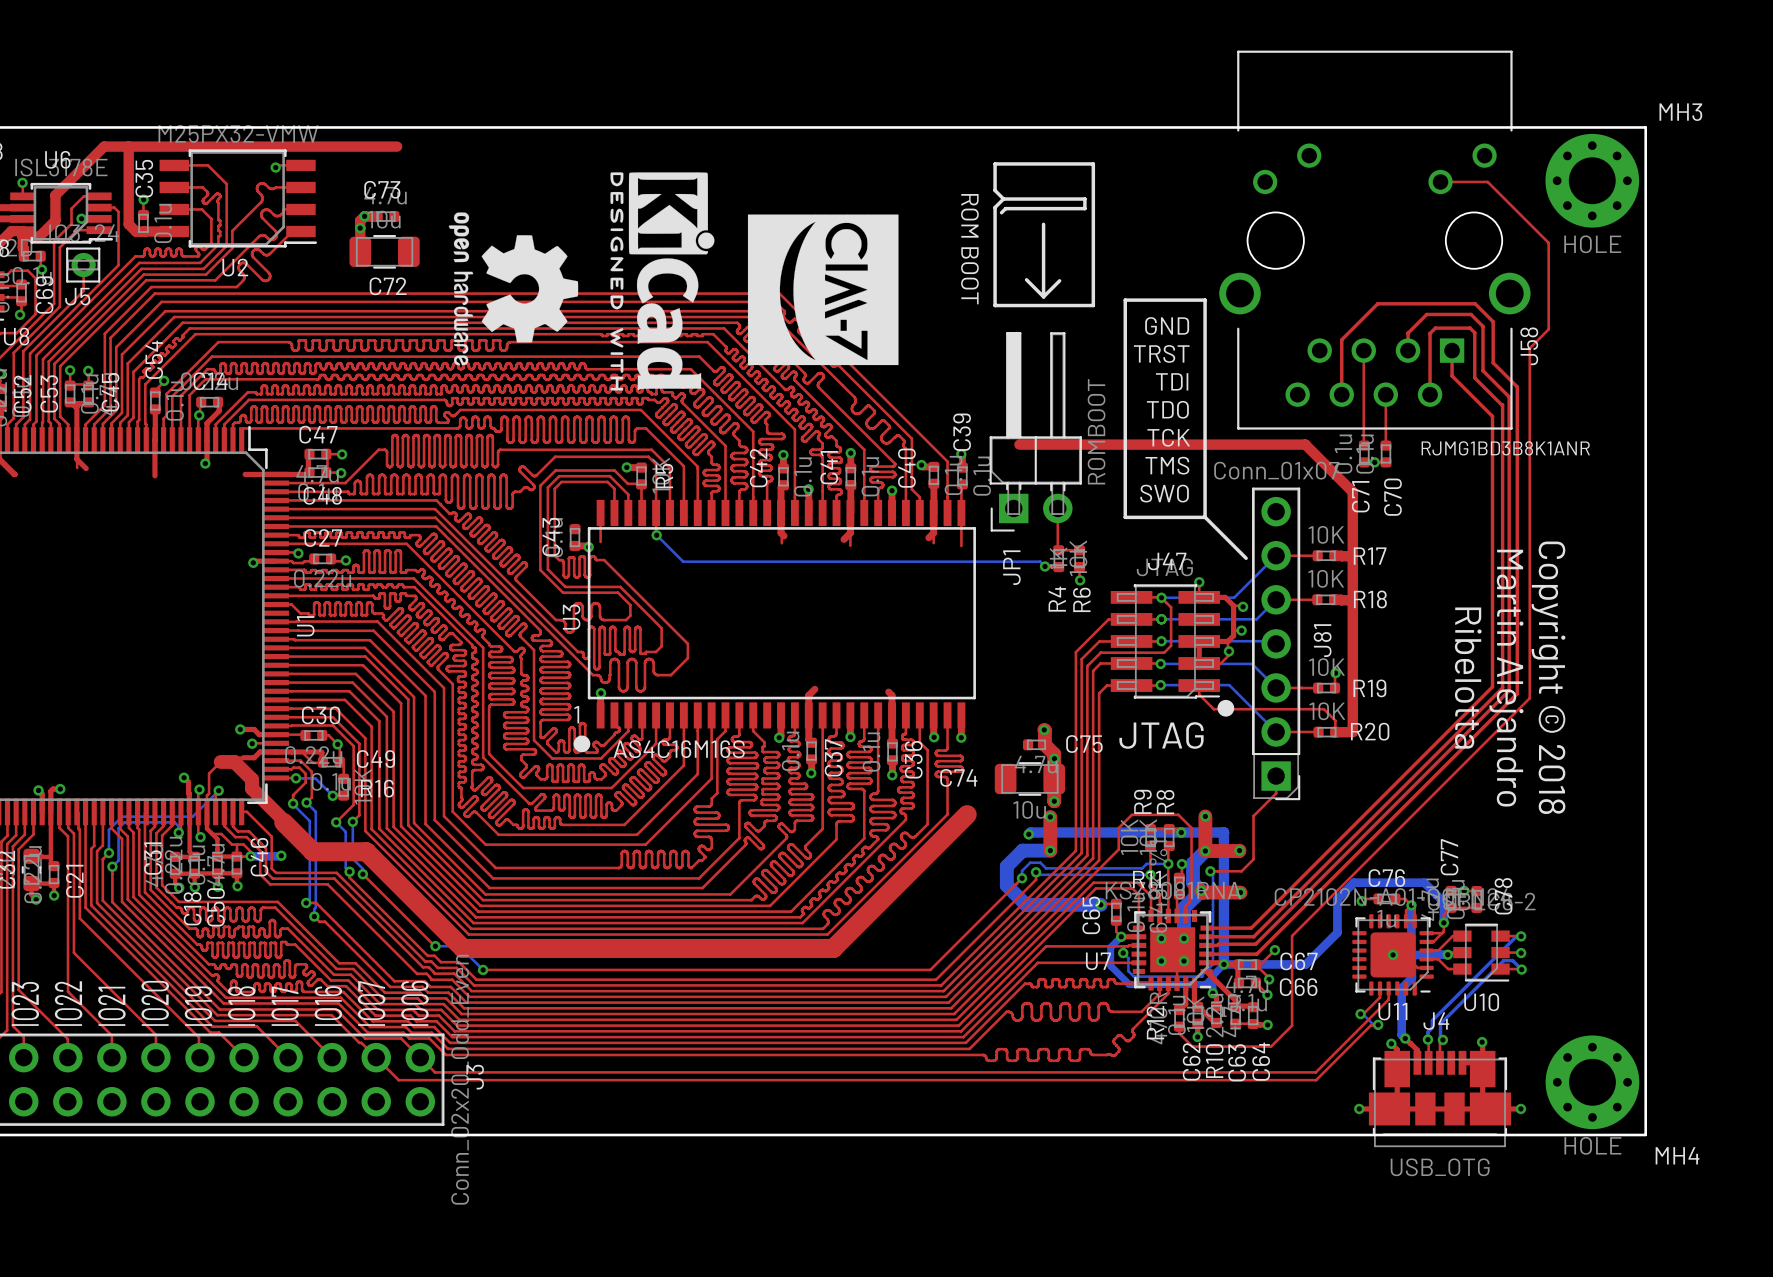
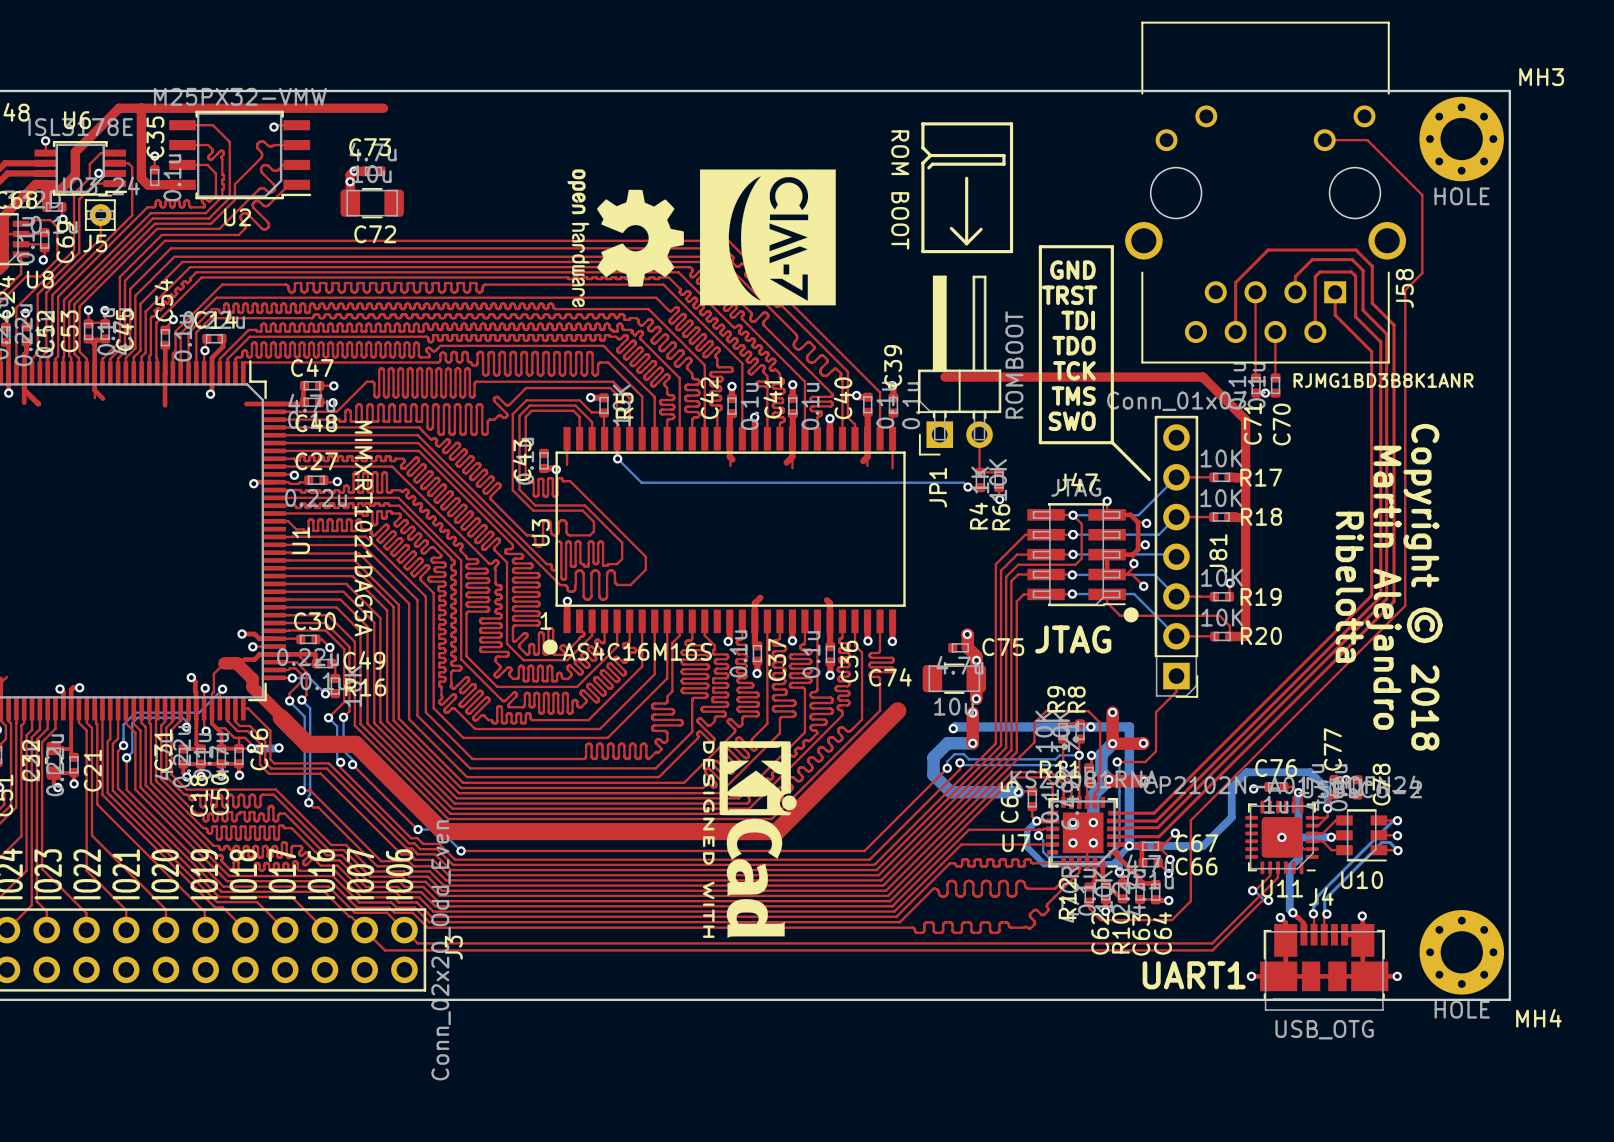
drawing: [610, 172, 715, 391] -> none
drawing position: (513, 288) -> (625, 238)
text: none -> MIMXRT1021DAG5A (363, 528)
top track: none -> (1126, 574) (1132, 574) (1143, 586)
via: none -> (1143, 586)
drawing: none -> [702, 741, 797, 938]
text: none -> UART1 (1194, 975)

